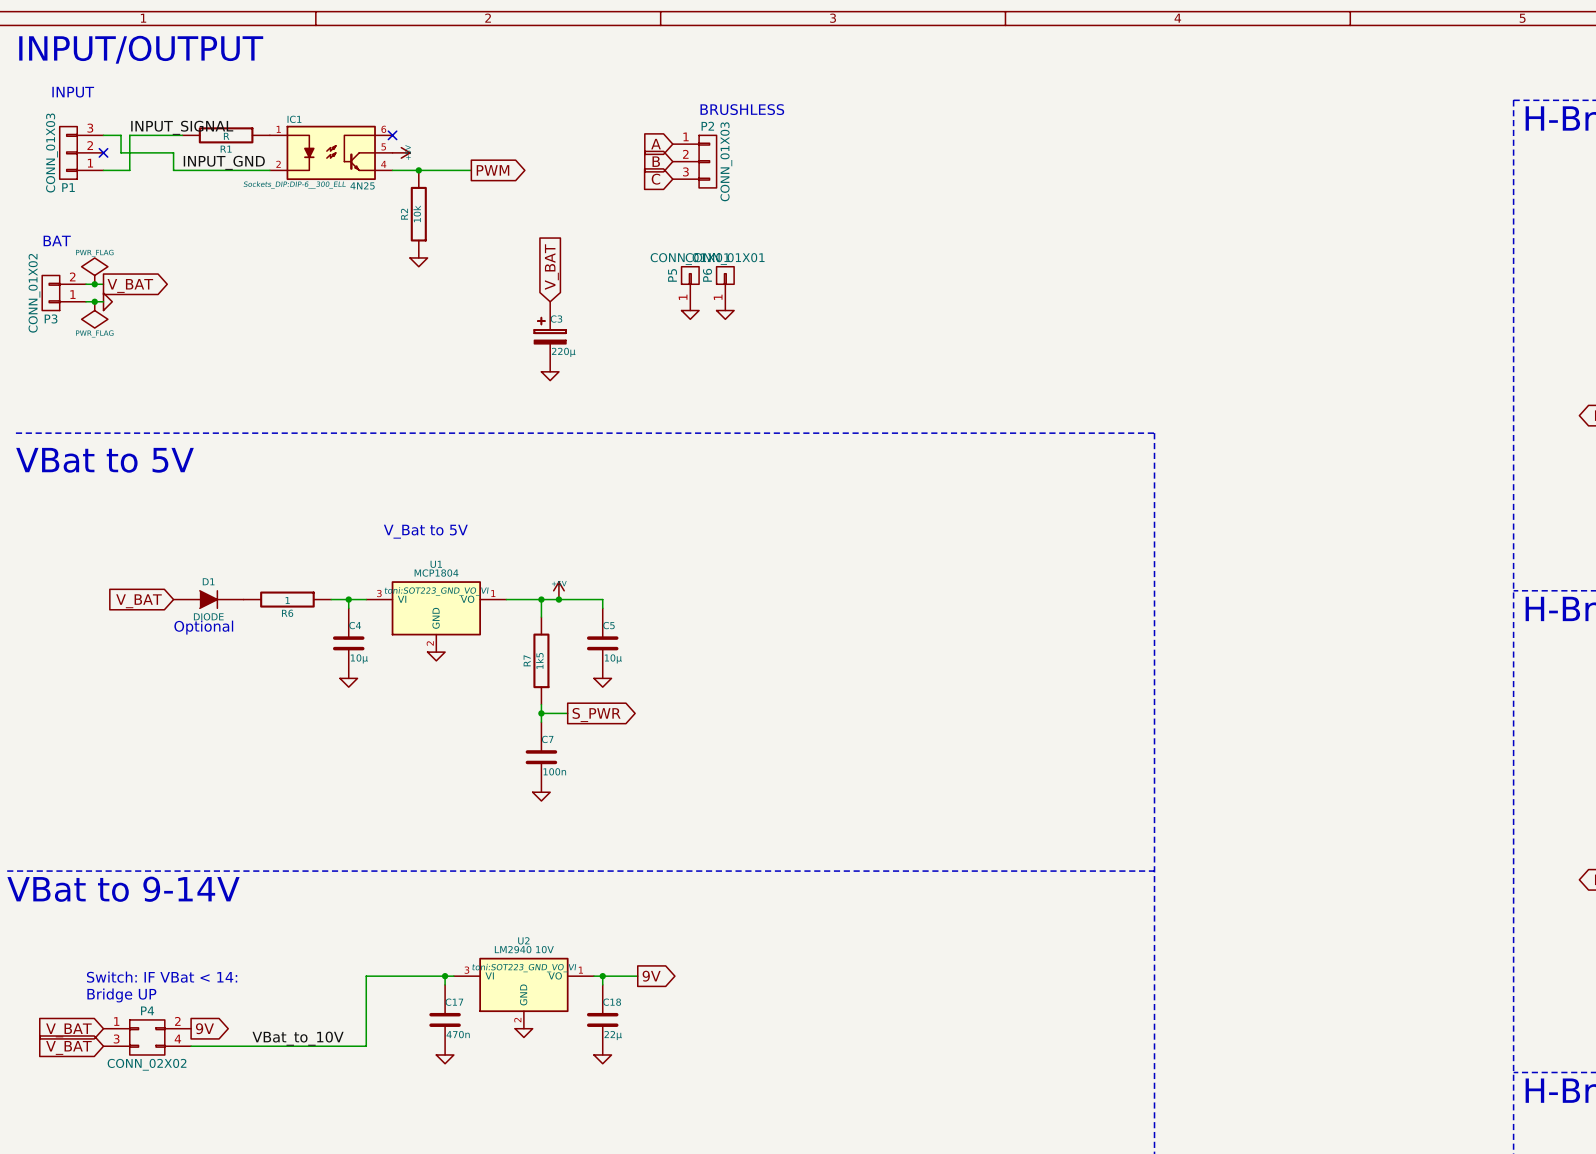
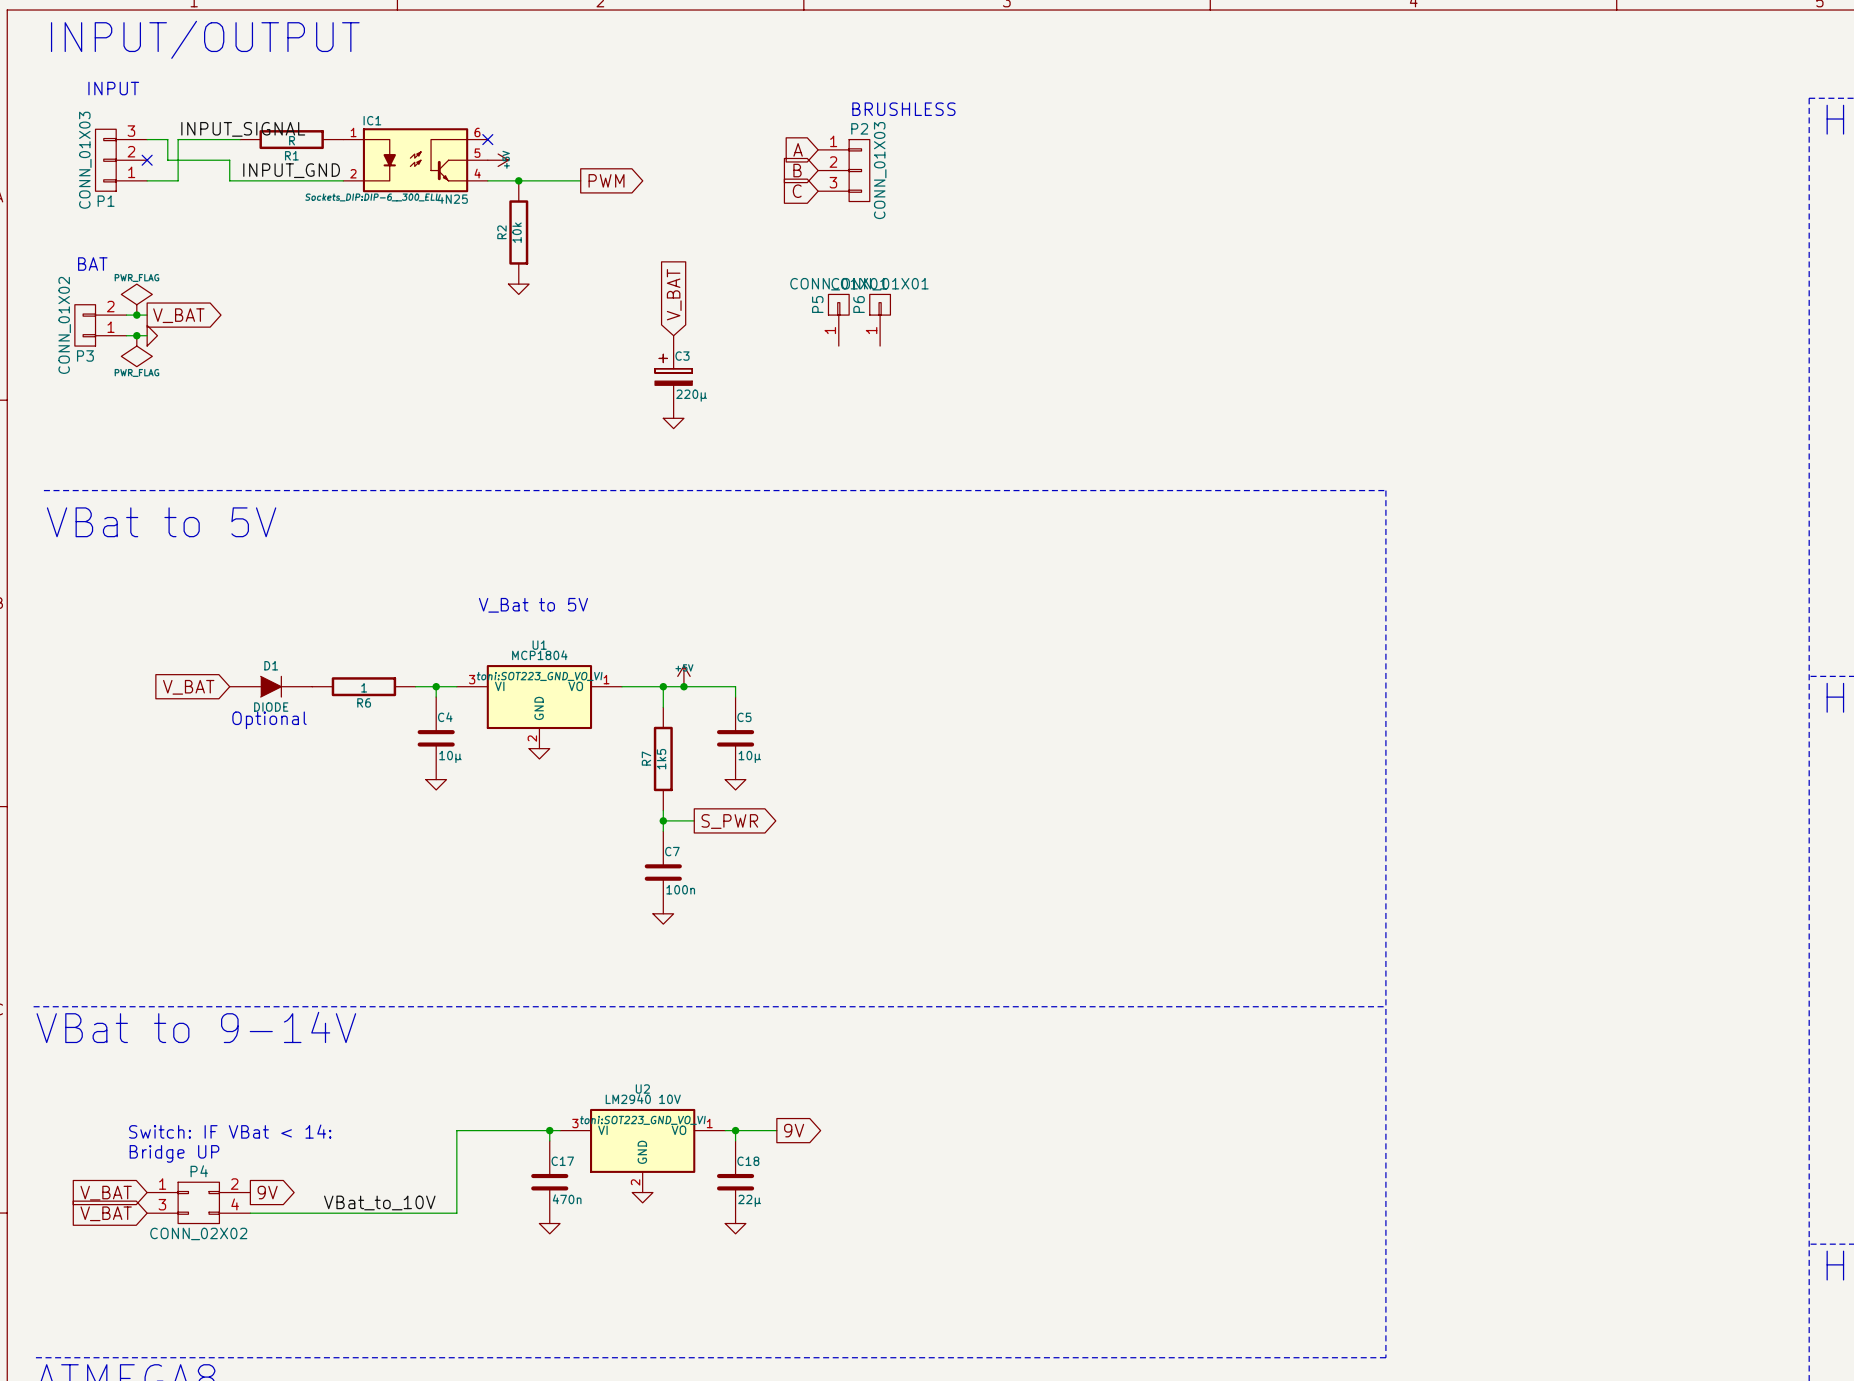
power symbol: (690, 314) -> none
power symbol: (725, 314) -> none

